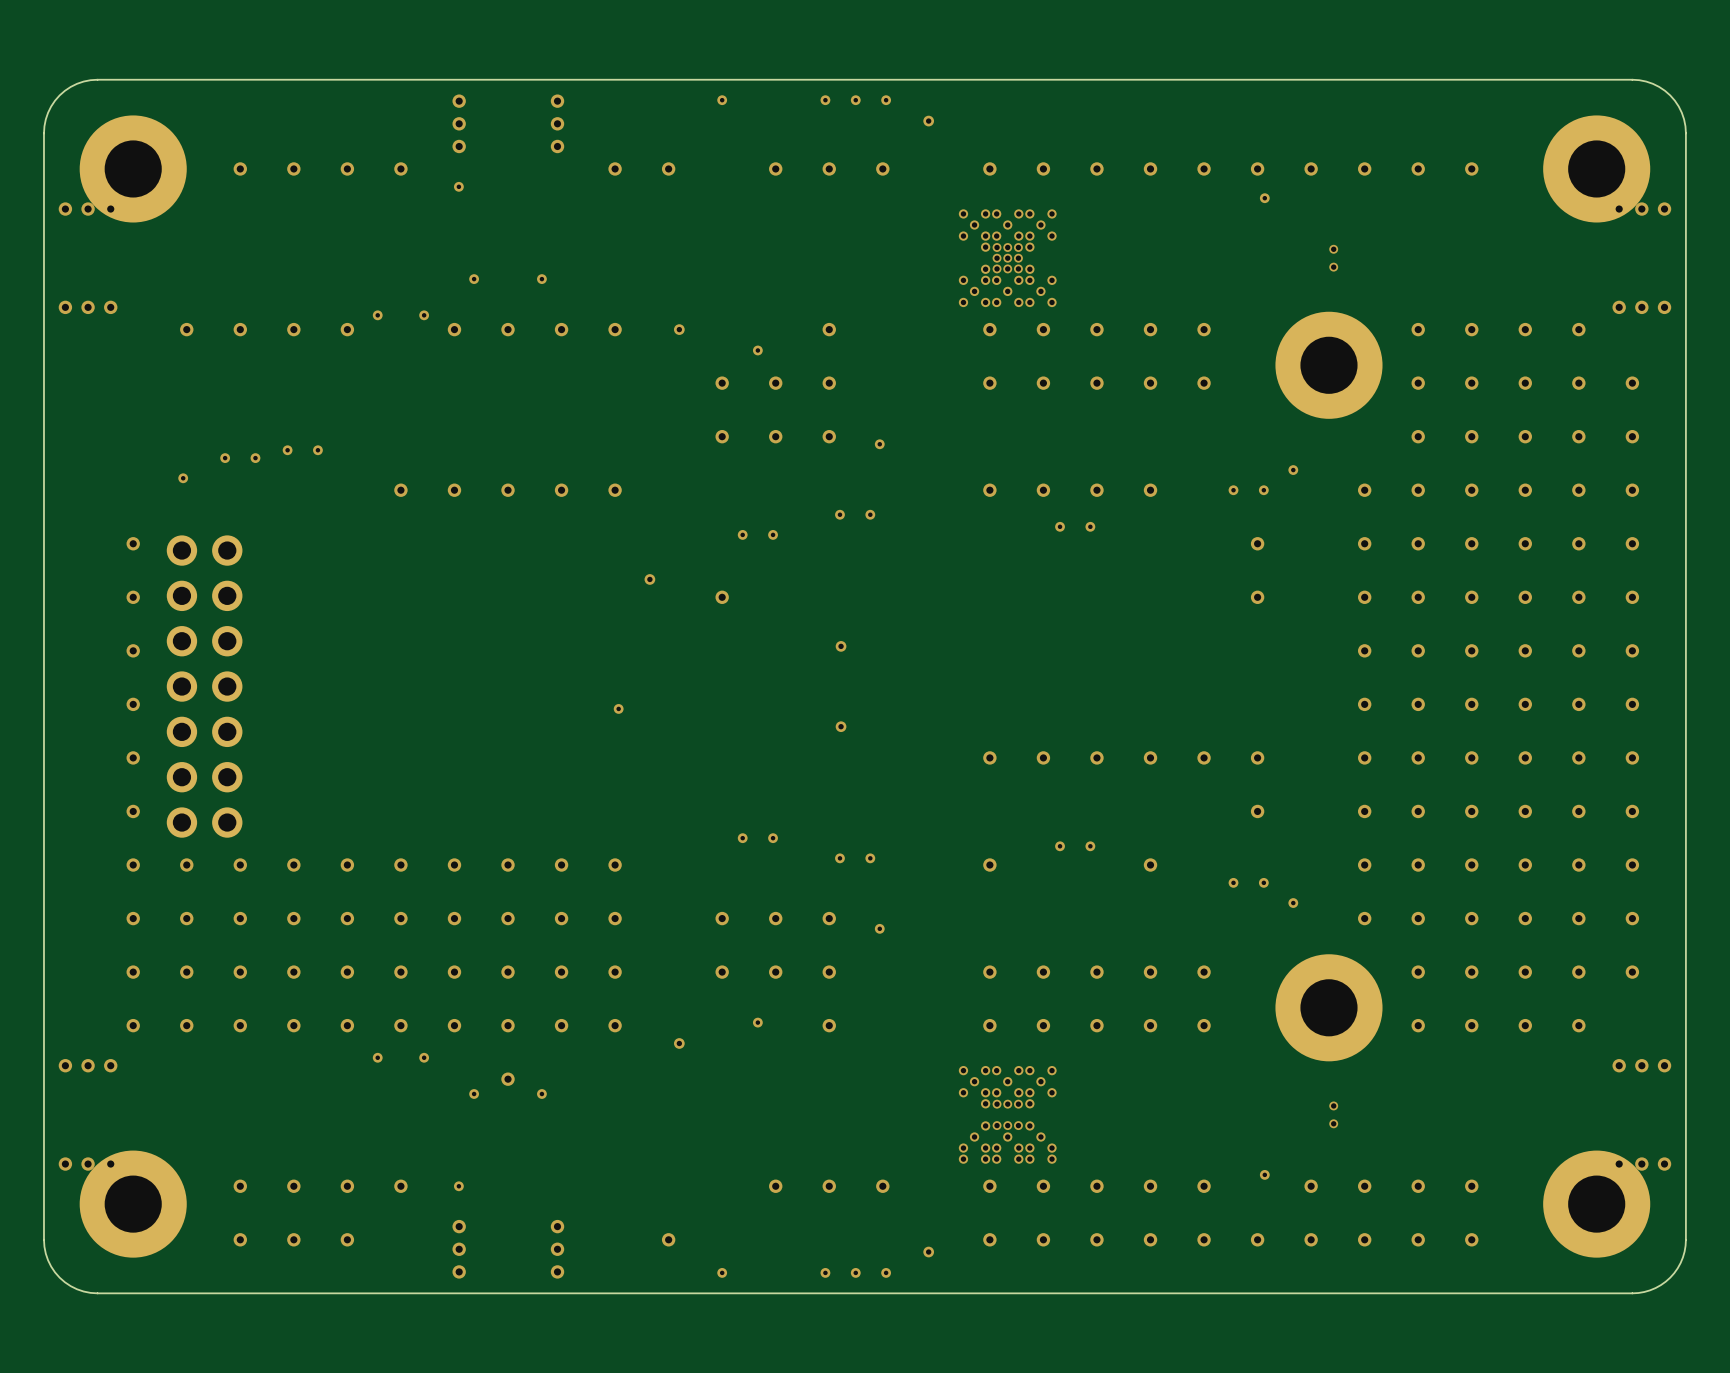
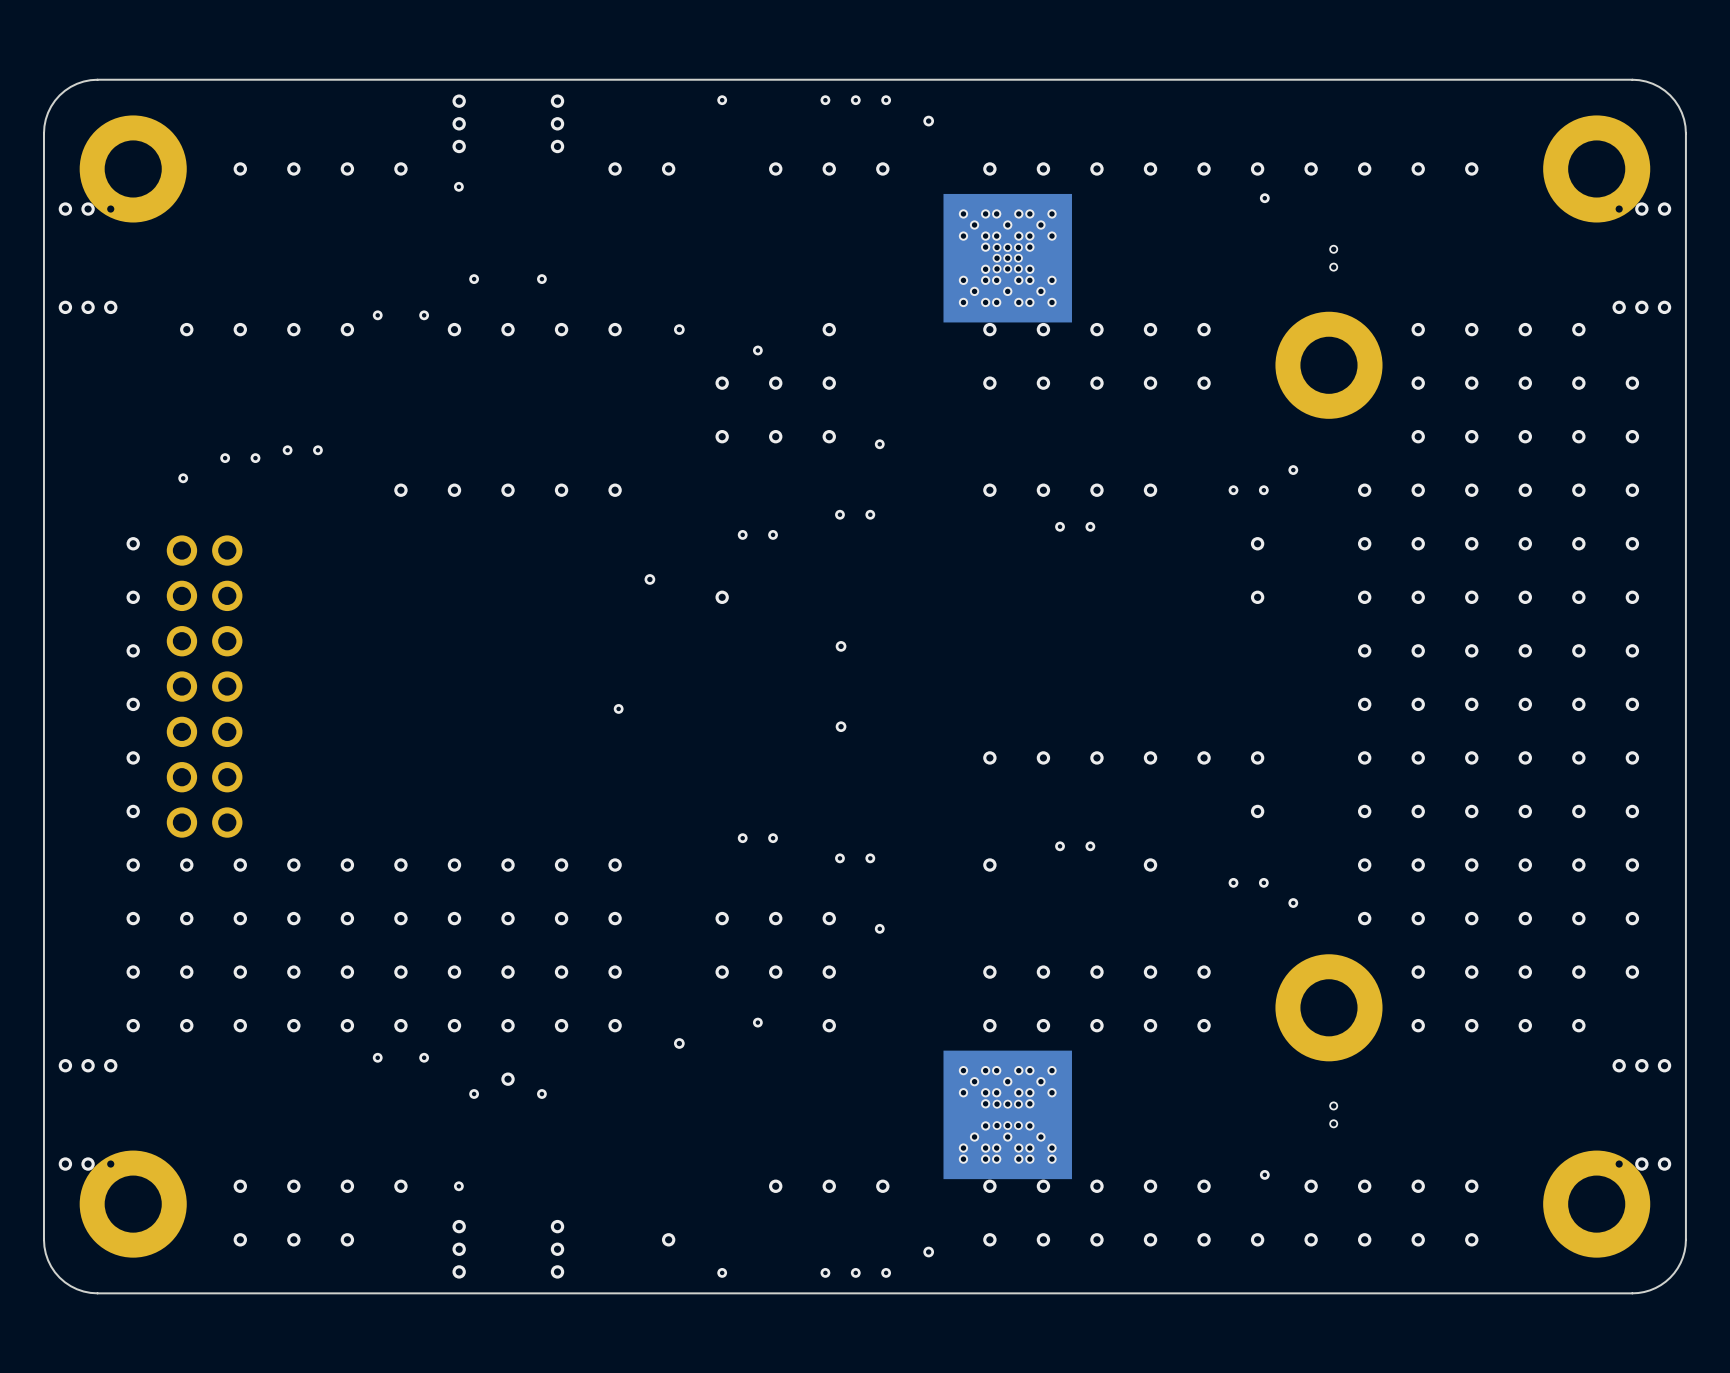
part: none -> (1007, 258)
part: none -> (1007, 1114)

